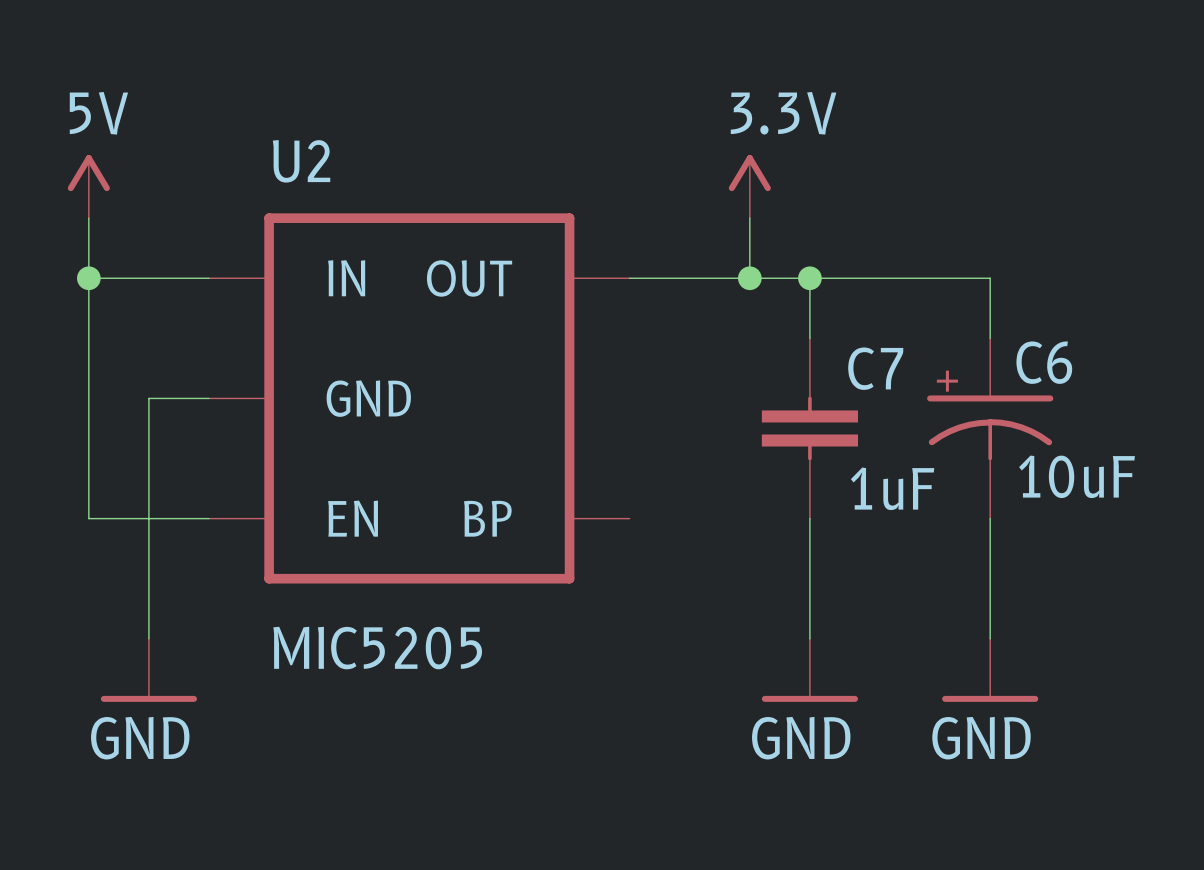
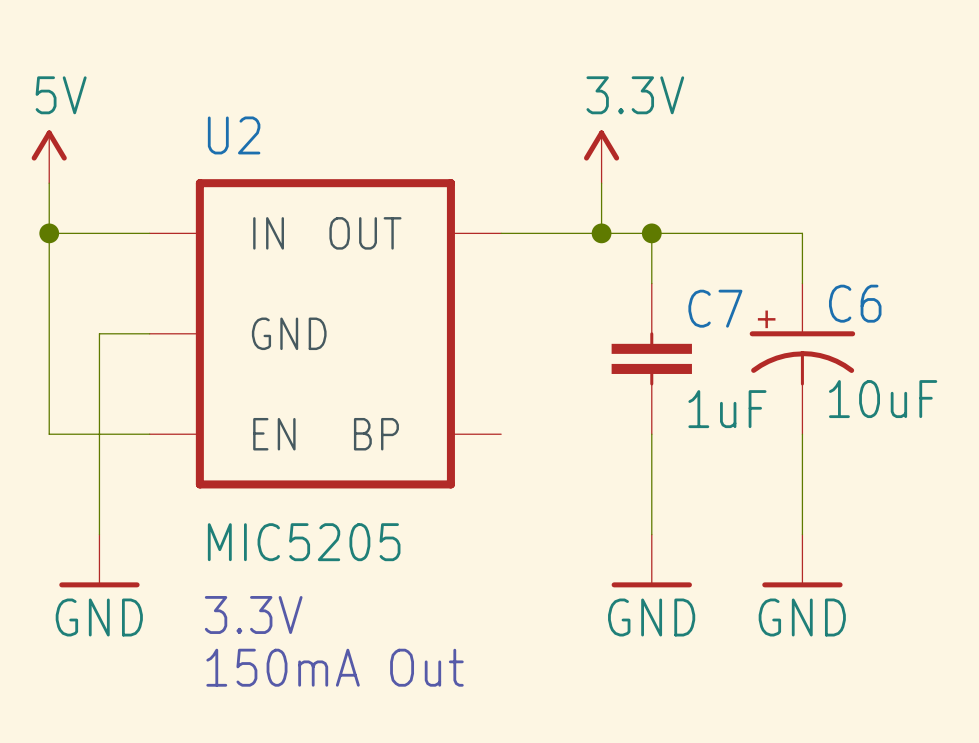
text: none -> 3.3V (253, 614)
text: none -> 150mA Out (335, 667)

